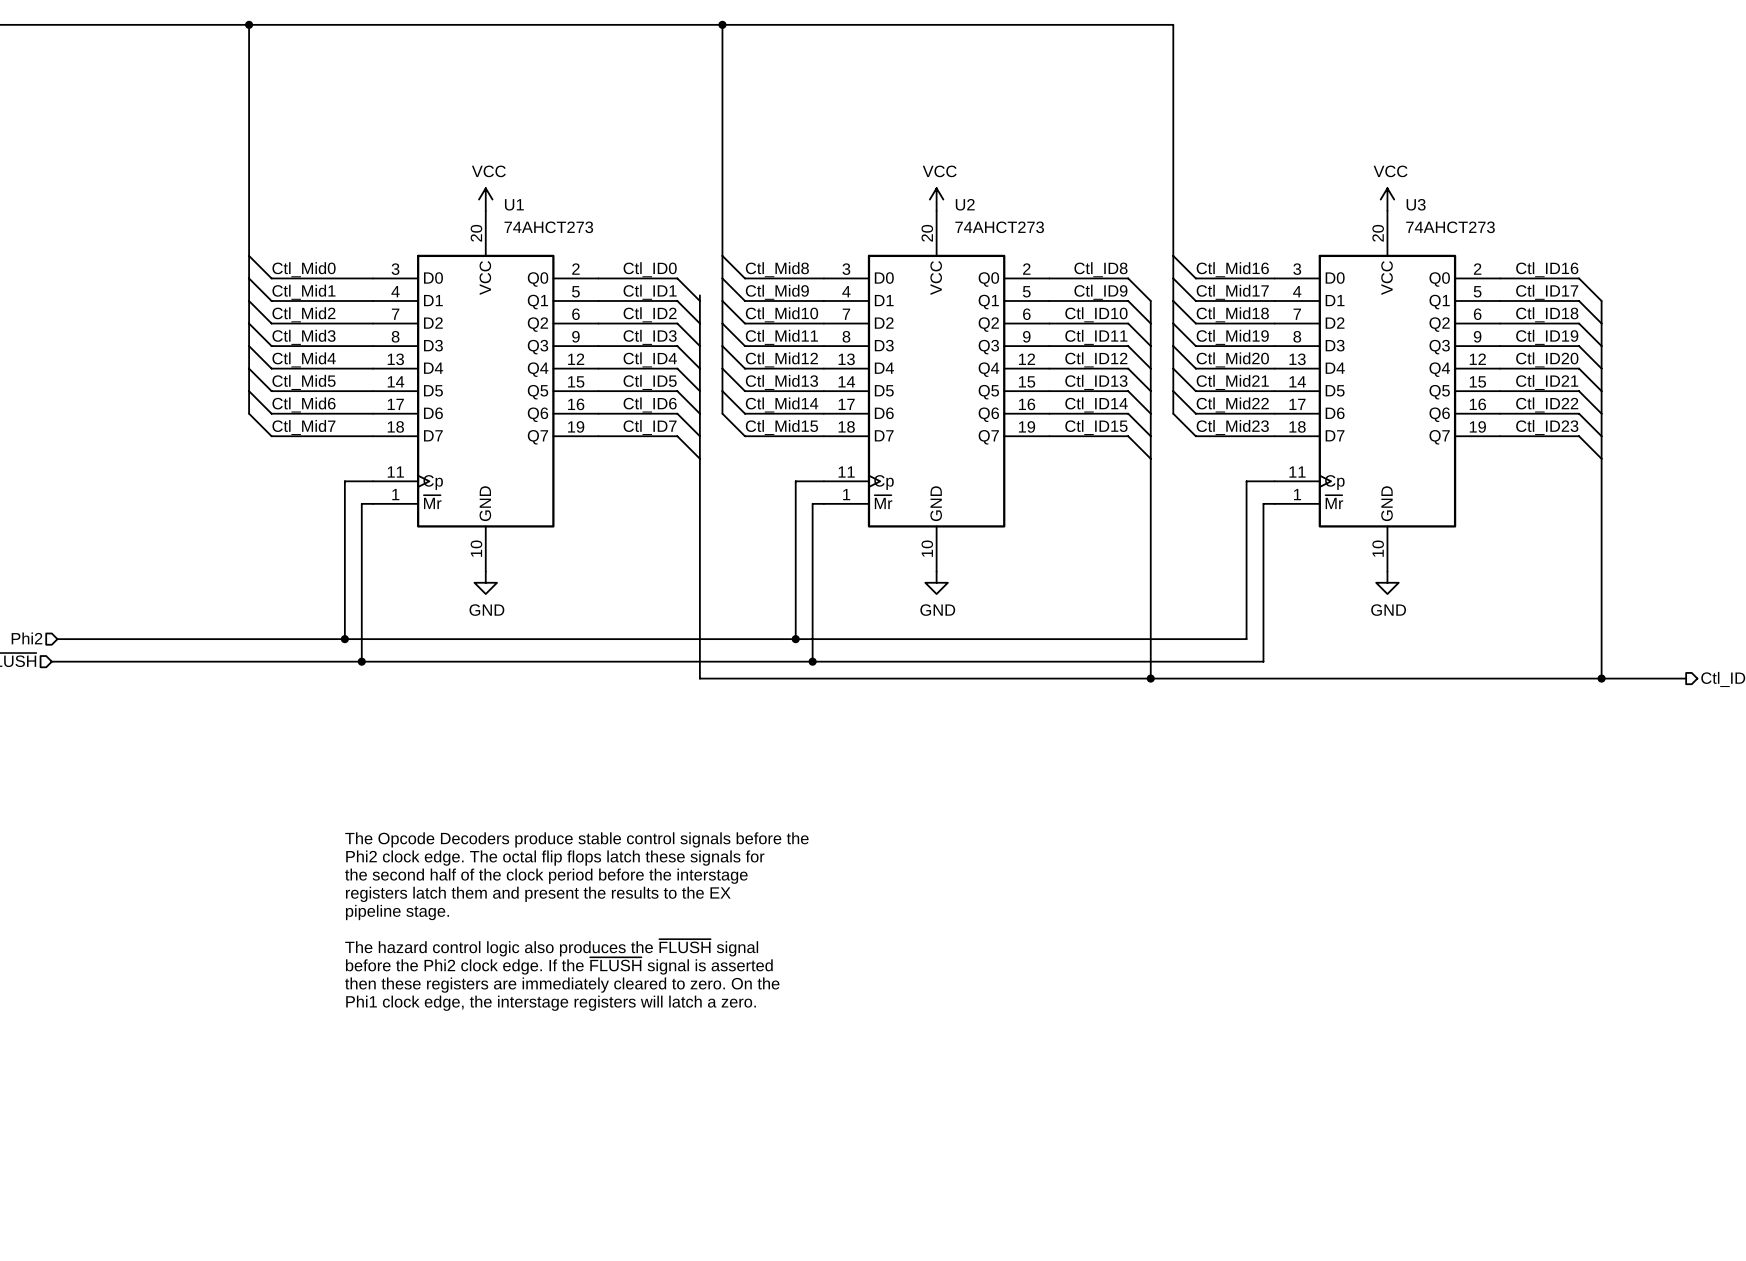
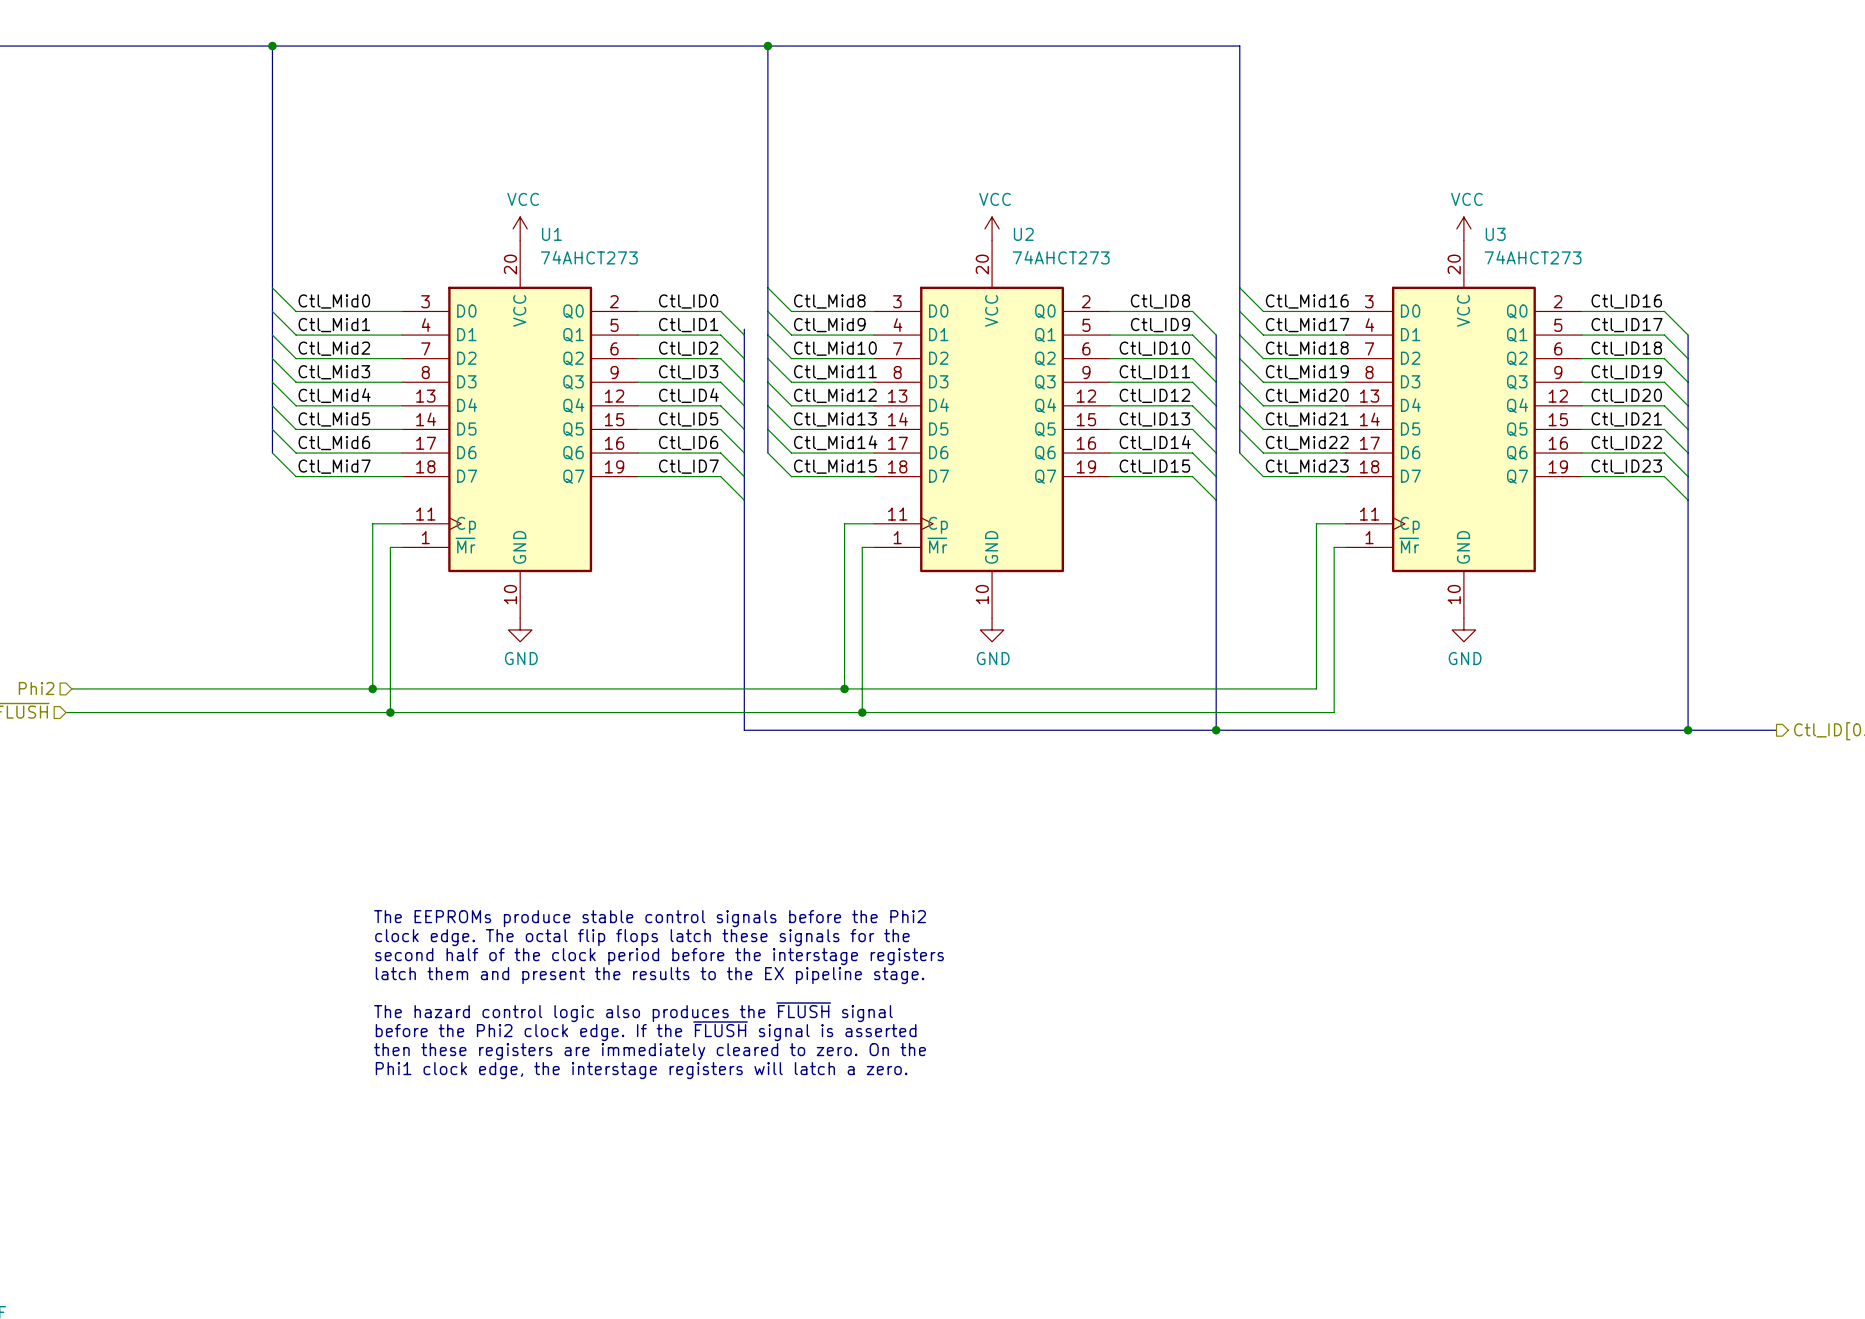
text: The Opcode Decoders produce stable control signals before the (576, 839) -> none
text: Phi2 clock edge. The octal flip flops latch these signals for (555, 858) -> The EEPROMs produce stable control signals before the Phi2 (650, 918)
text: the second half of the clock period before the interstage (546, 876) -> clock edge. The octal flip flops latch these signals for the (642, 937)
text: registers latch them and present the results to the EX (538, 894) -> second half of the clock period before the interstage registers (659, 956)
text: pipeline stage. (397, 912) -> latch them and present the results to the EX pipeline stage. (650, 975)

